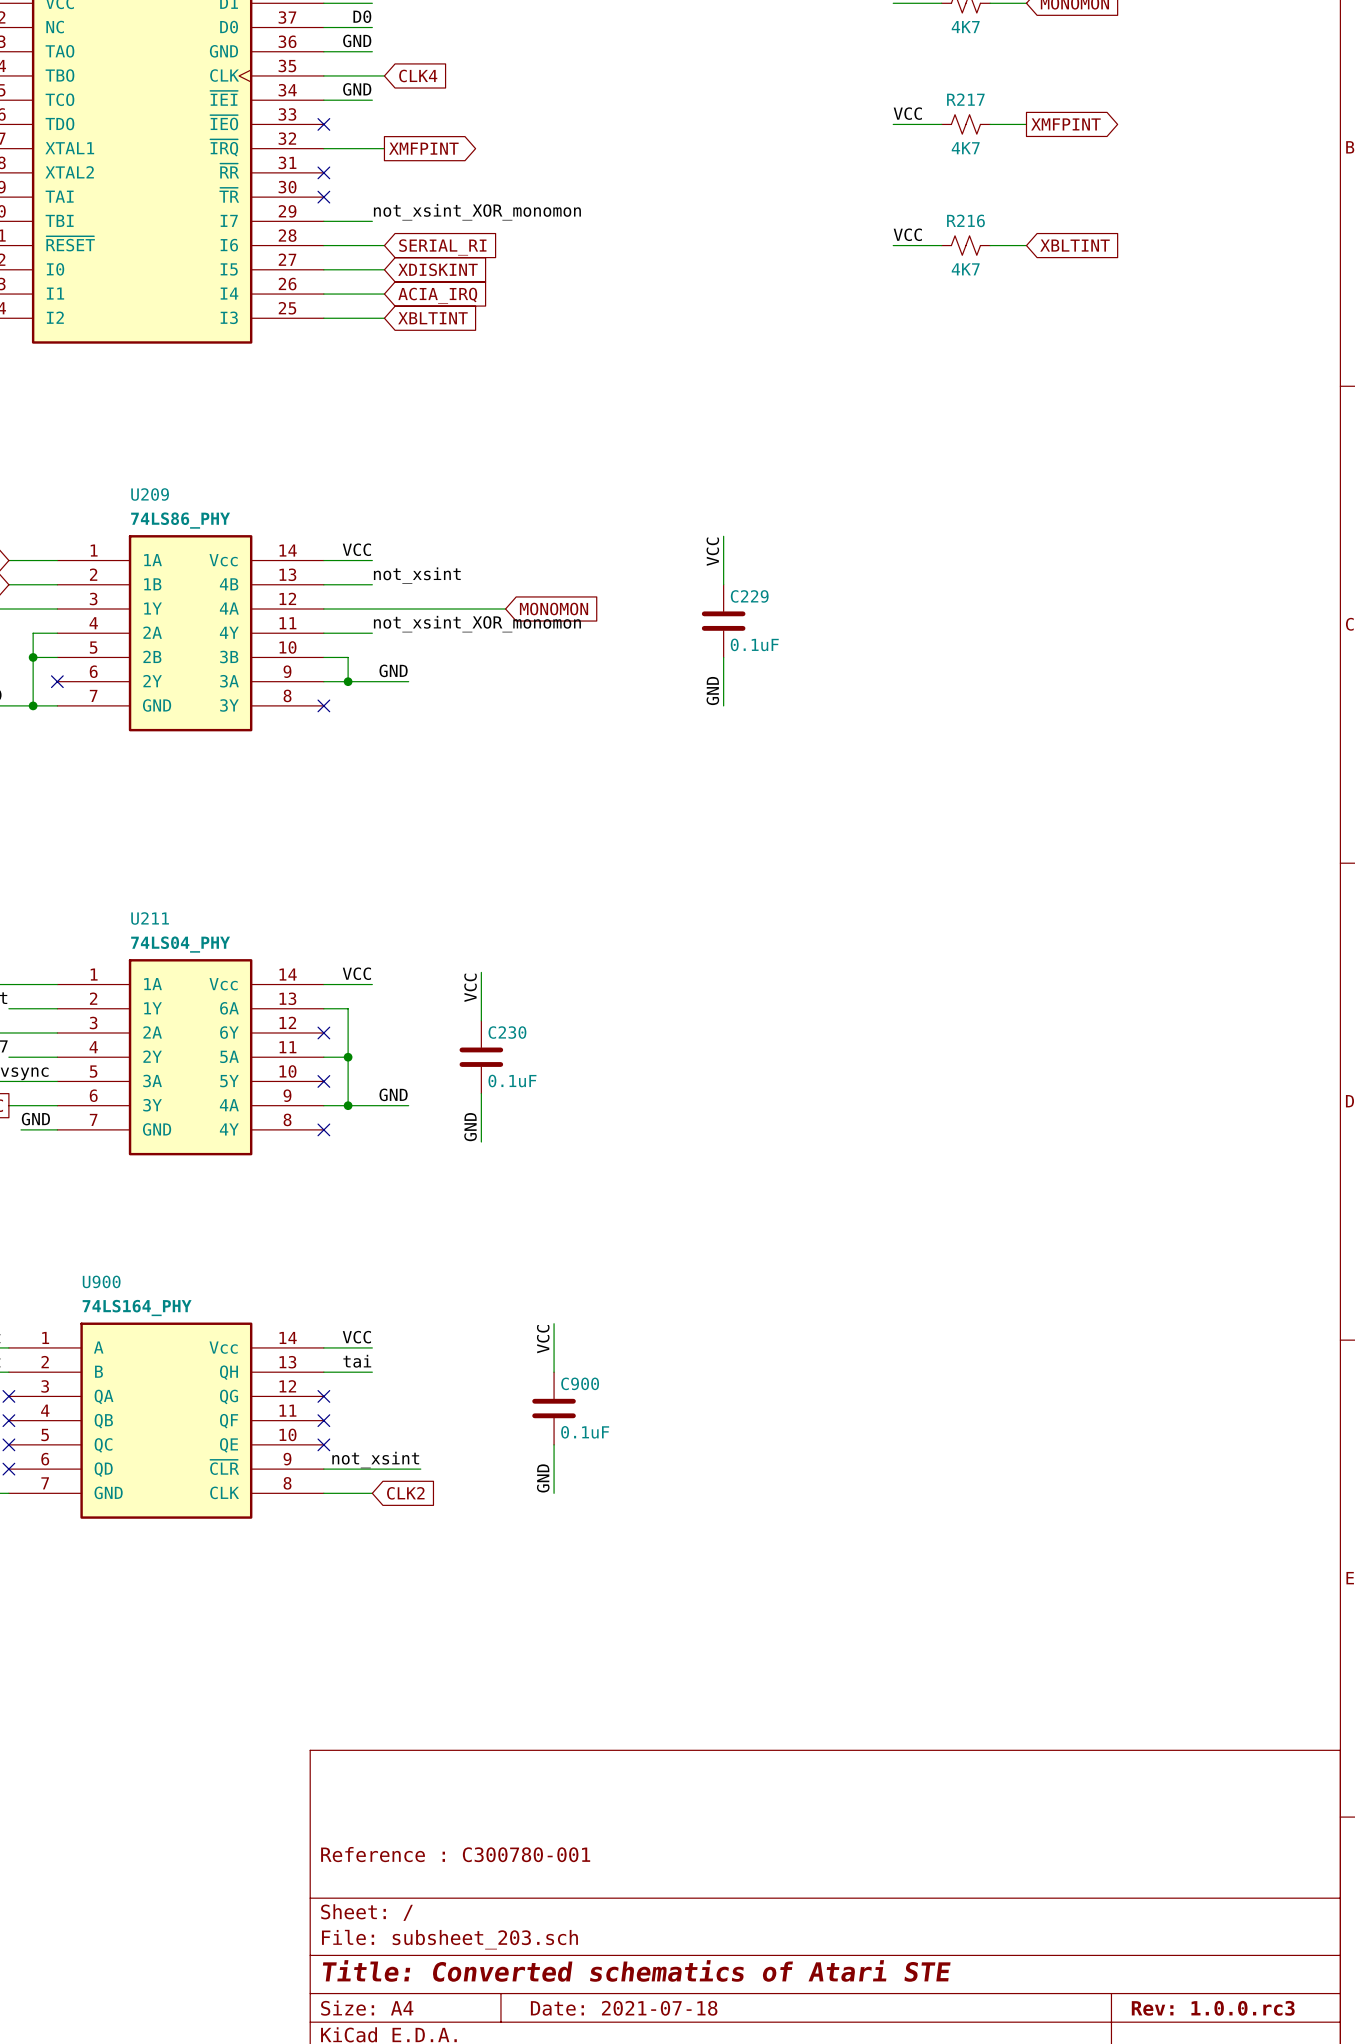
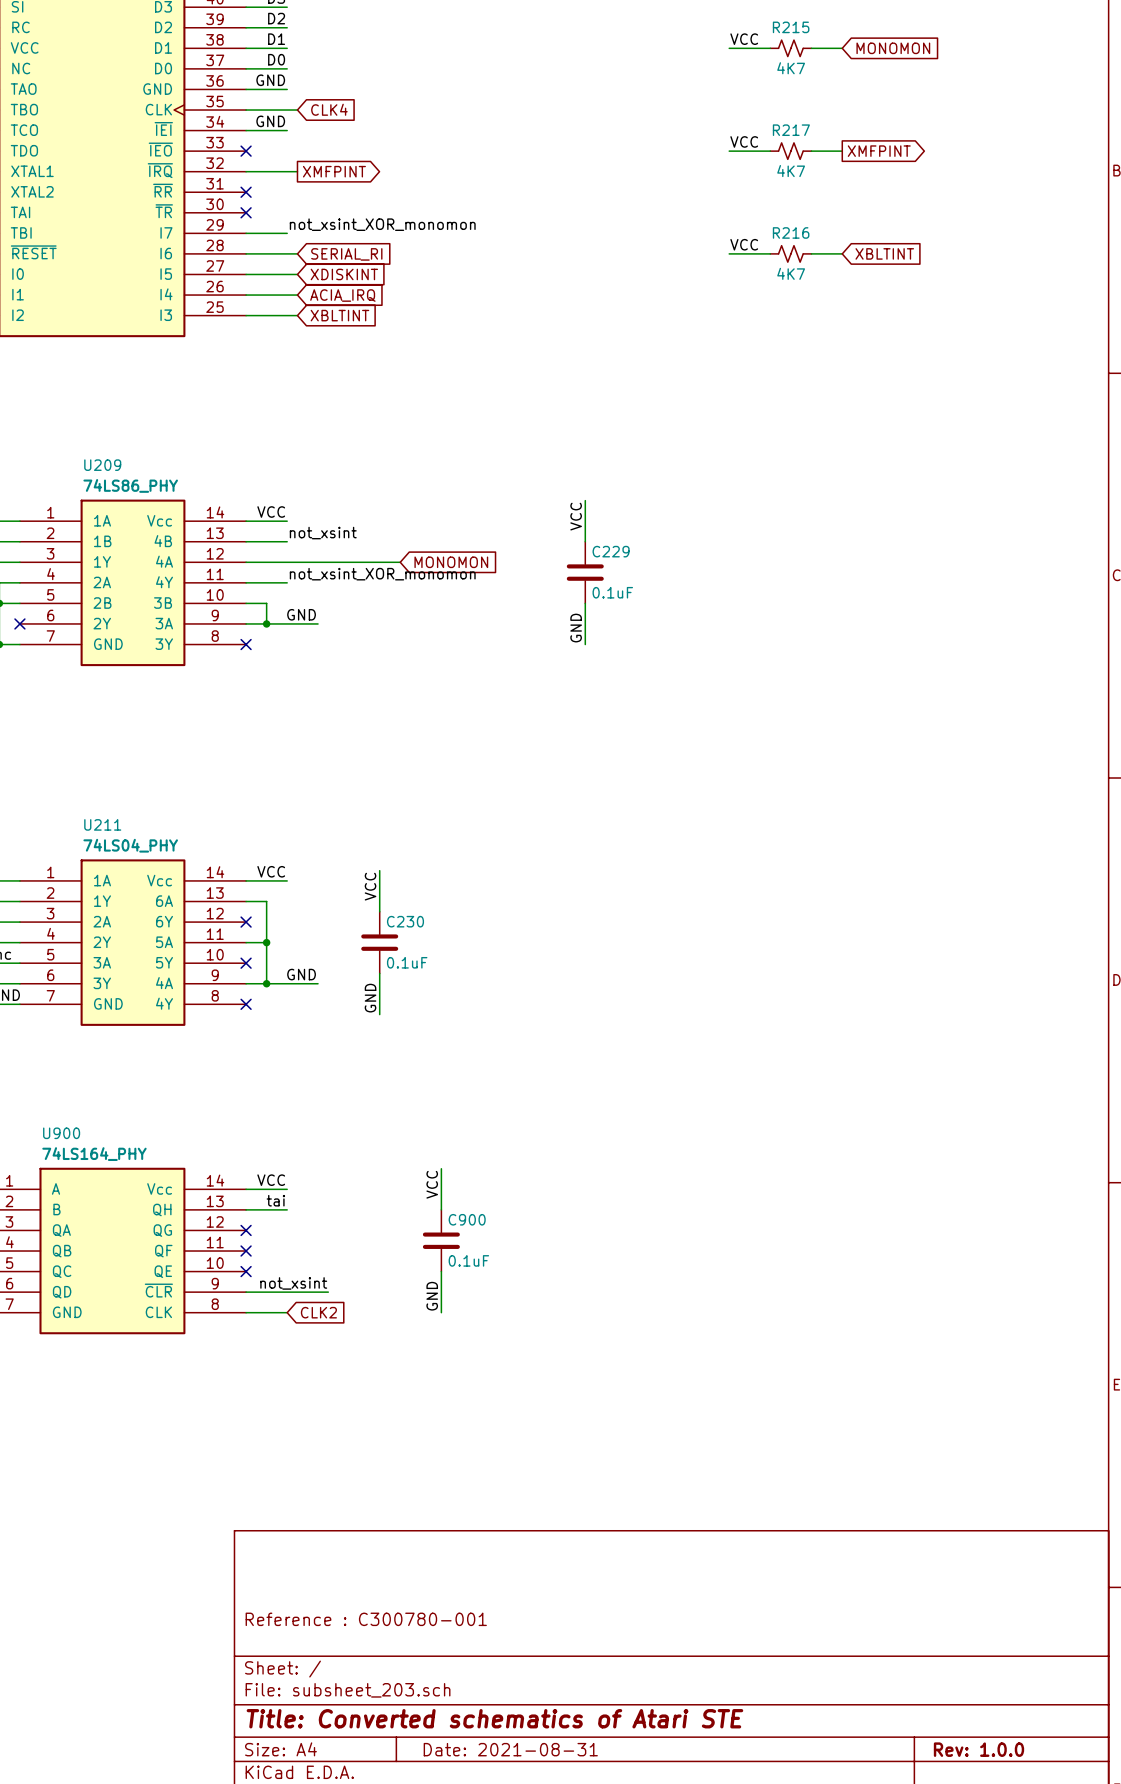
title block: Date: 2021-07-18 (624, 2008) -> Date: 2021-08-31 (510, 1749)
title block: Rev: 1.0.0.rc3 (1213, 2008) -> Rev: 1.0.0 (978, 1749)

